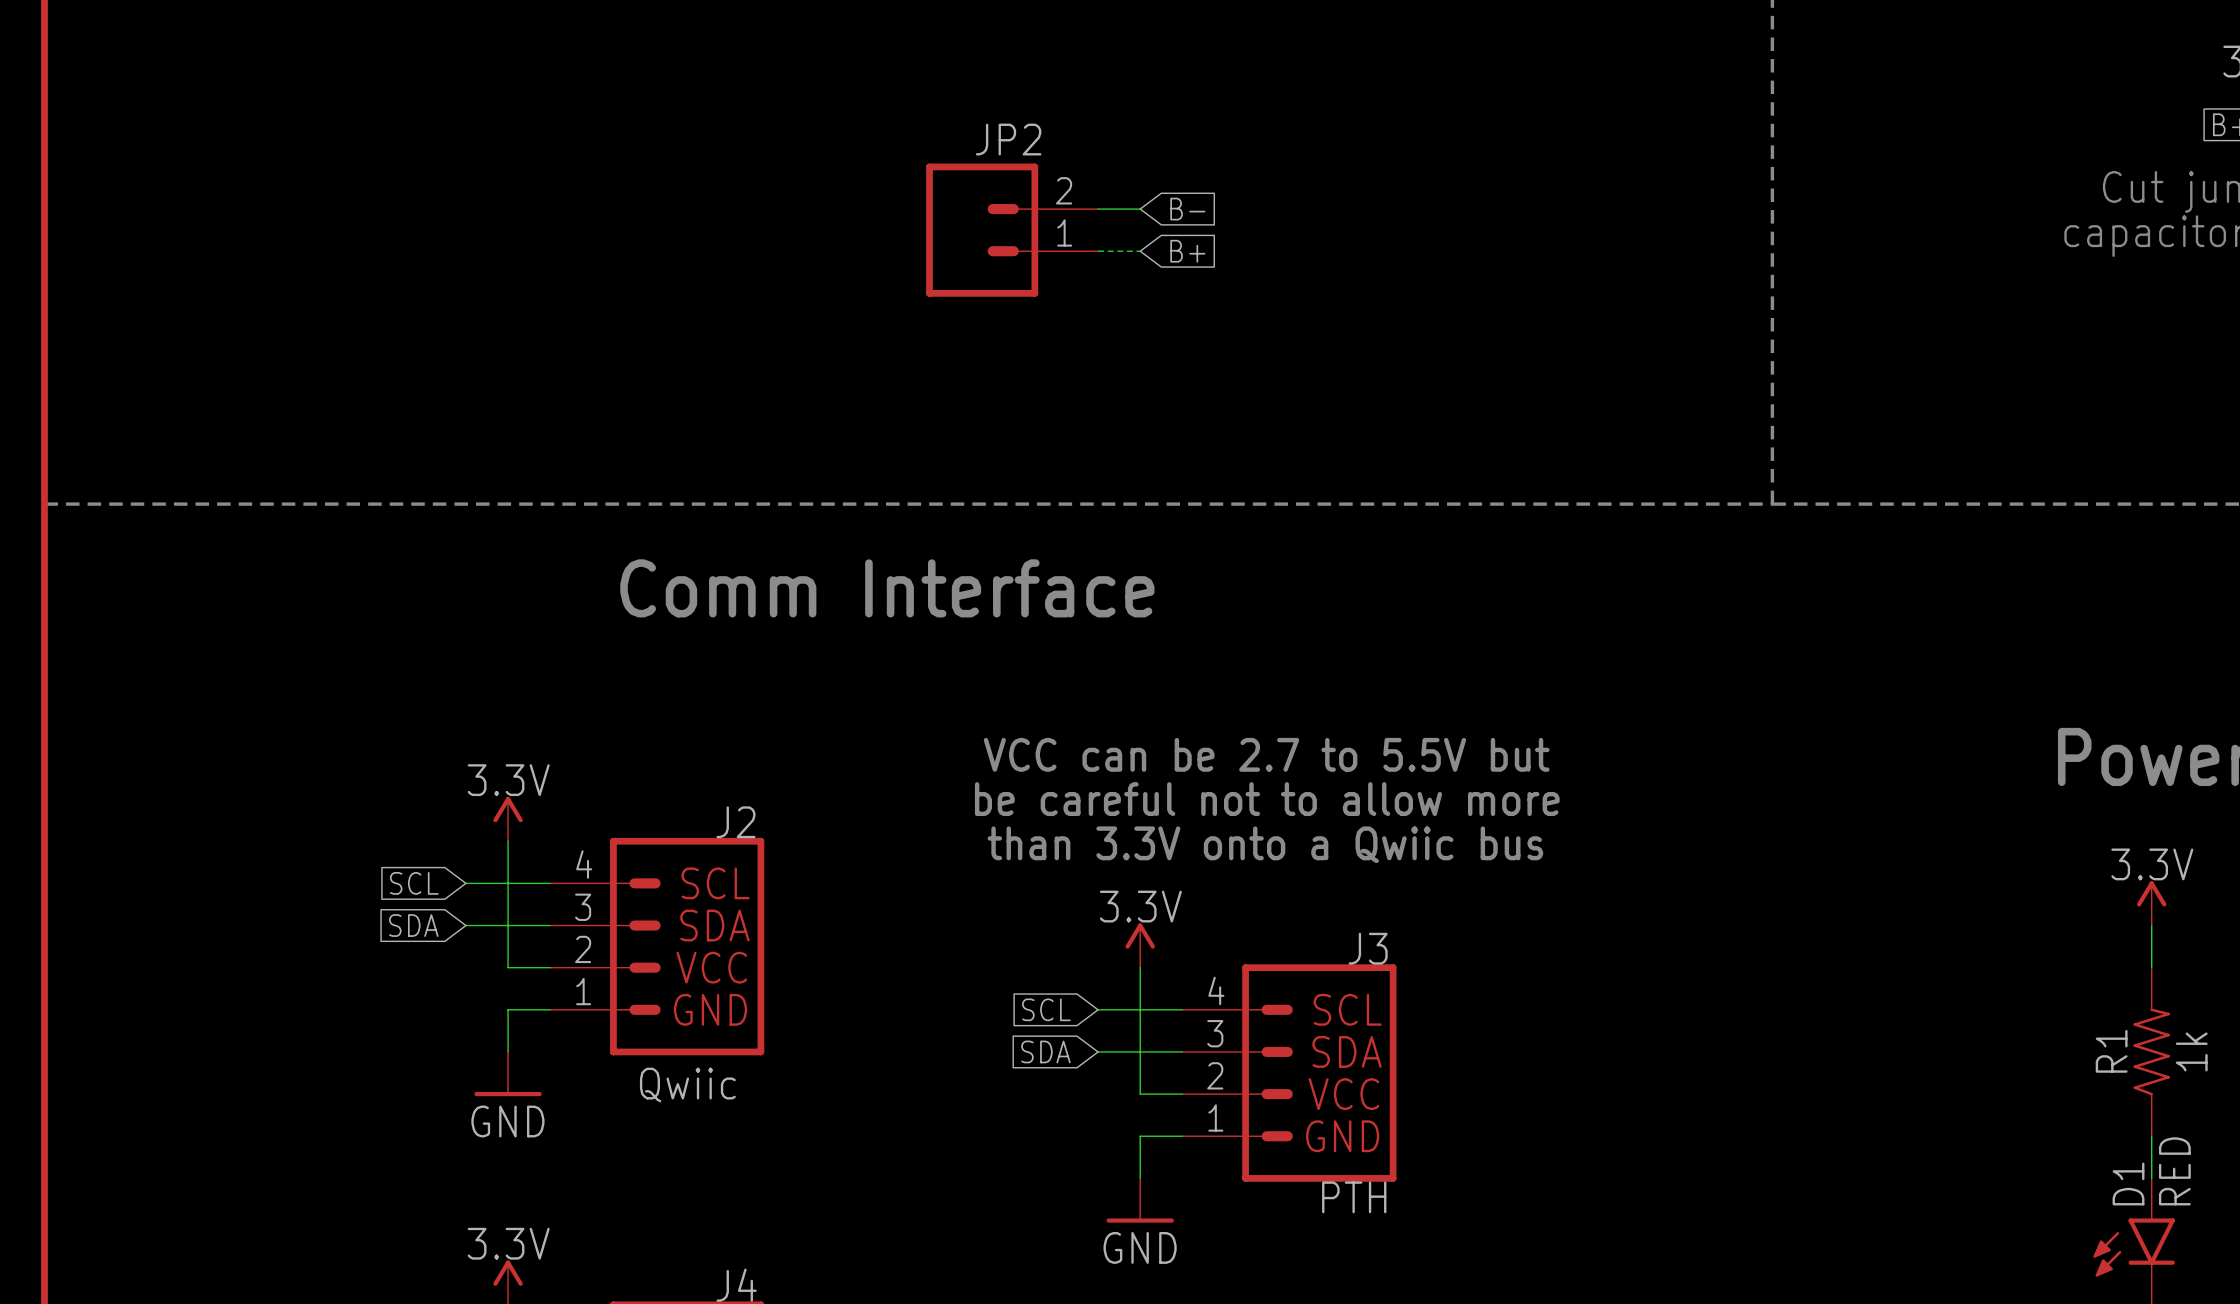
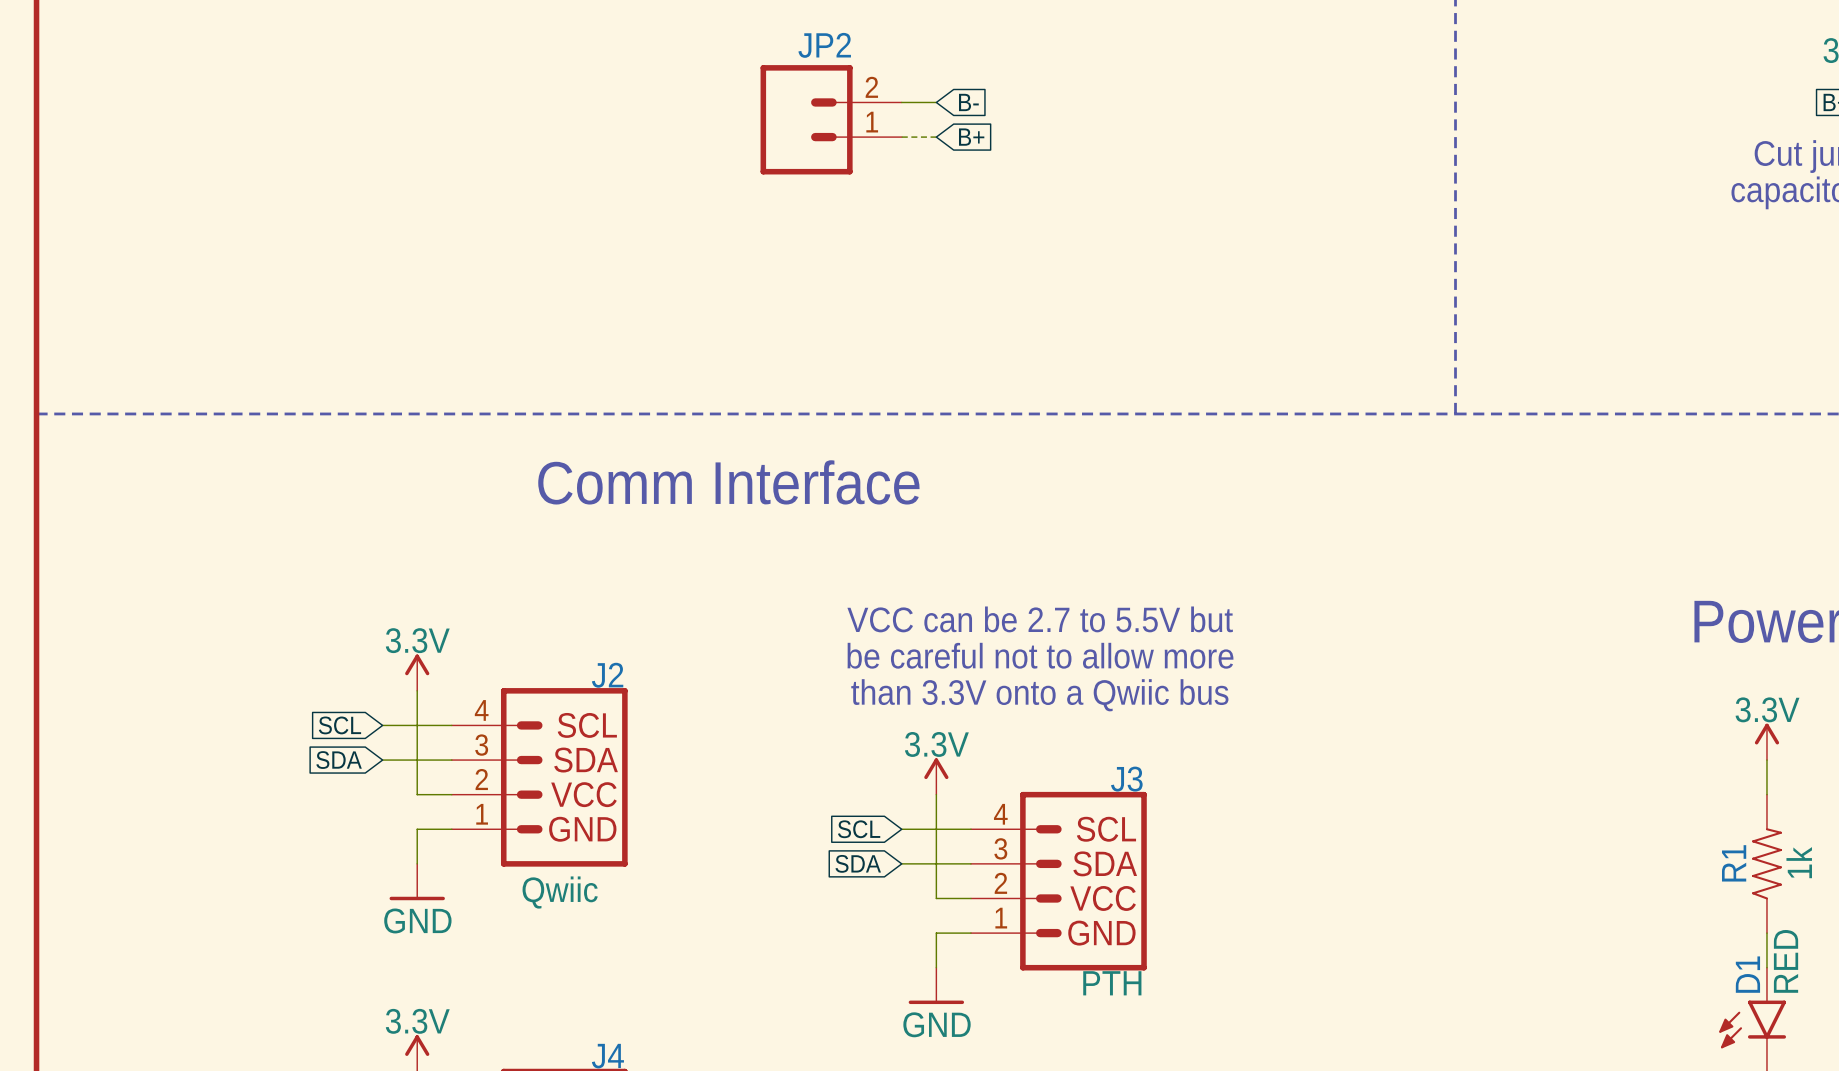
wire: (1098, 209) (1140, 209) -> (901, 137) (936, 137)
global label position: B- (1187, 209) -> B- (968, 102)
JP2 position: (1012, 230) -> (831, 119)
wire: (1098, 251) (1140, 251) -> (901, 102) (936, 102)
global label position: B+ (1187, 251) -> B+ (971, 137)

